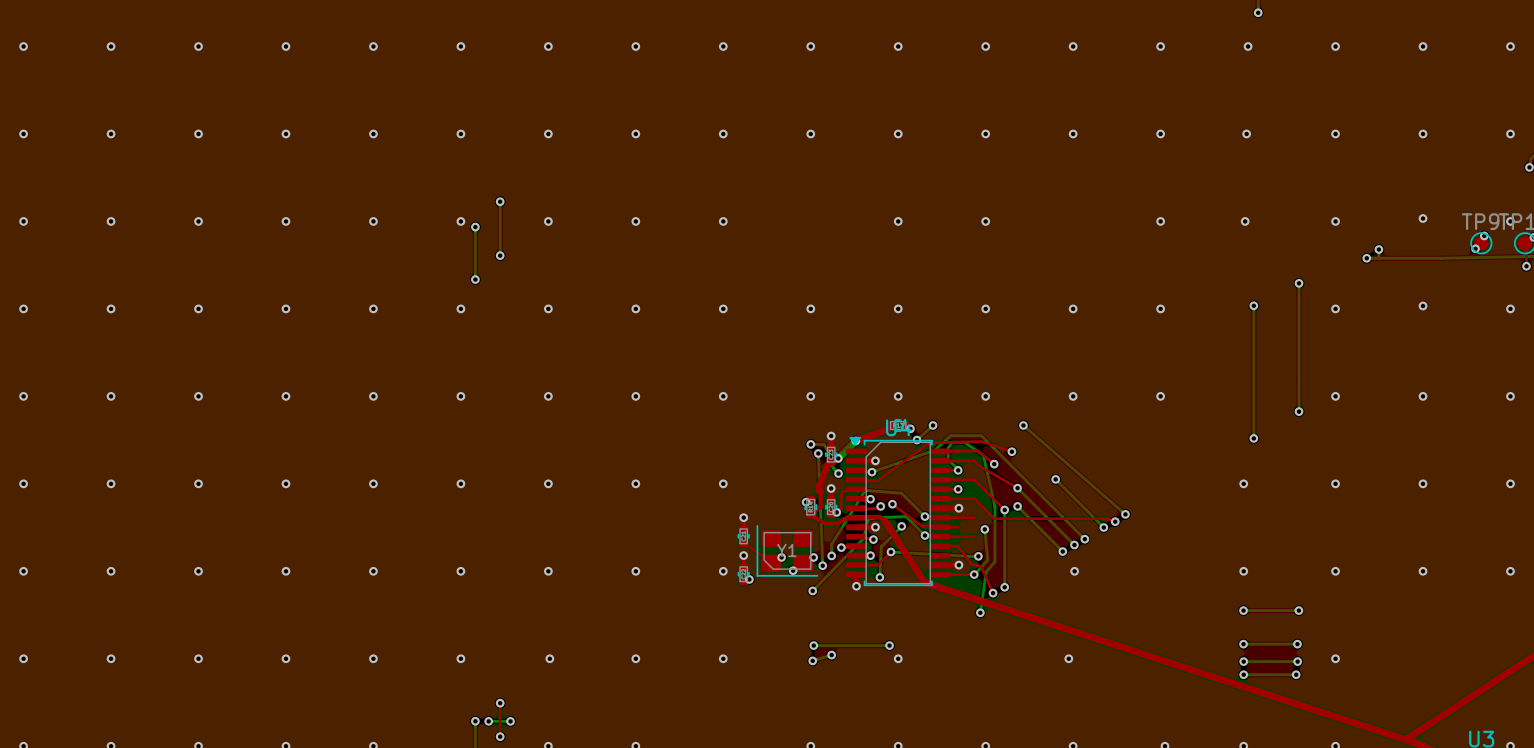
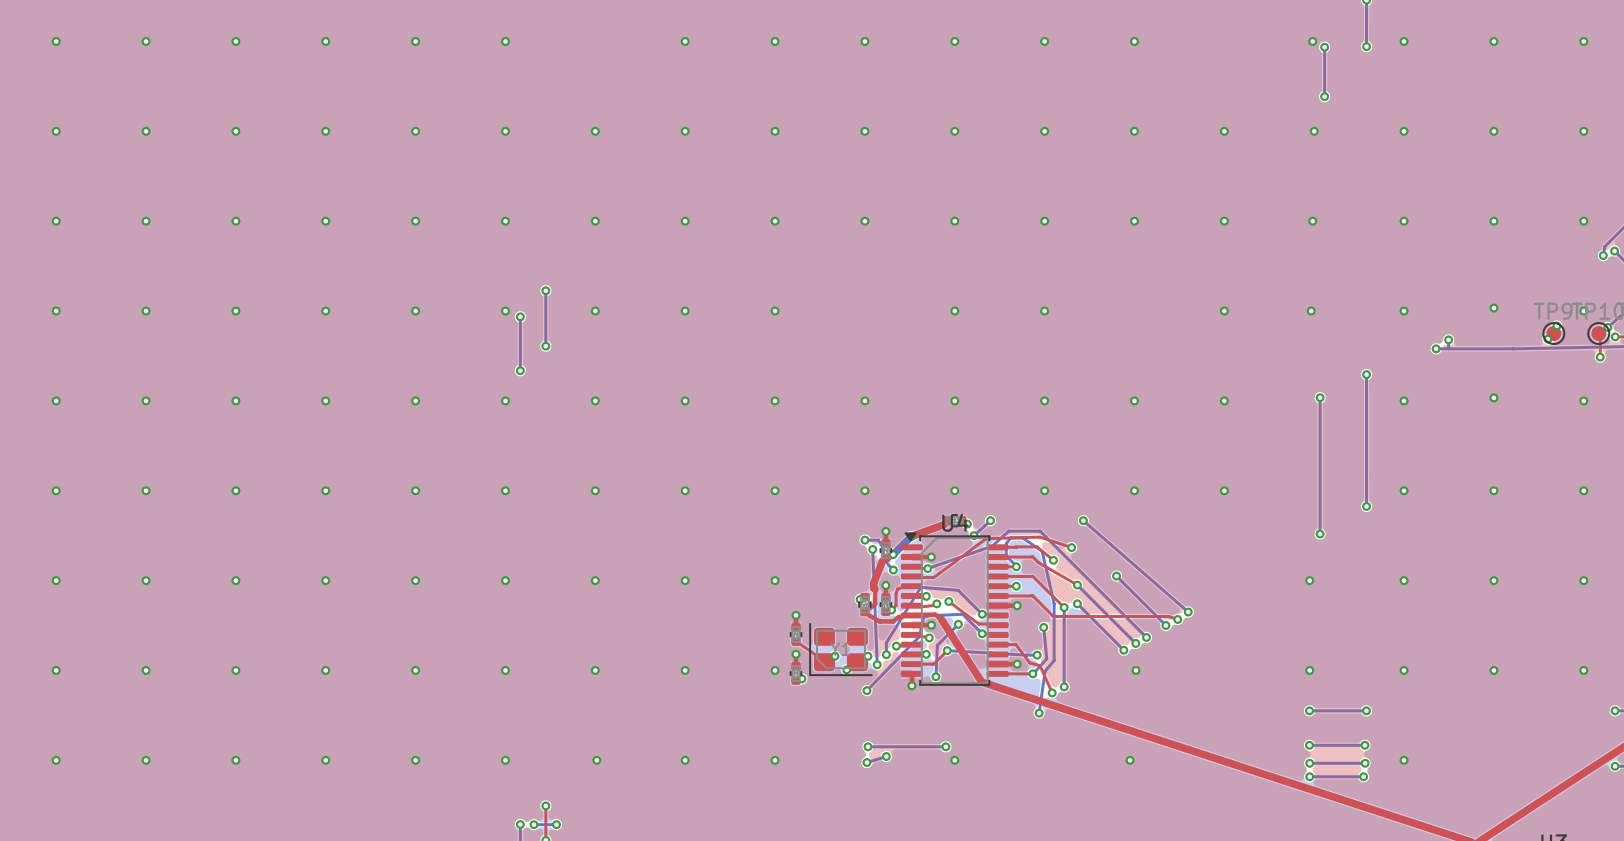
top track: (939, 517) (974, 517) -> none
top track: (939, 527) (958, 527) -> none
top track: (939, 536) (974, 536) -> none

